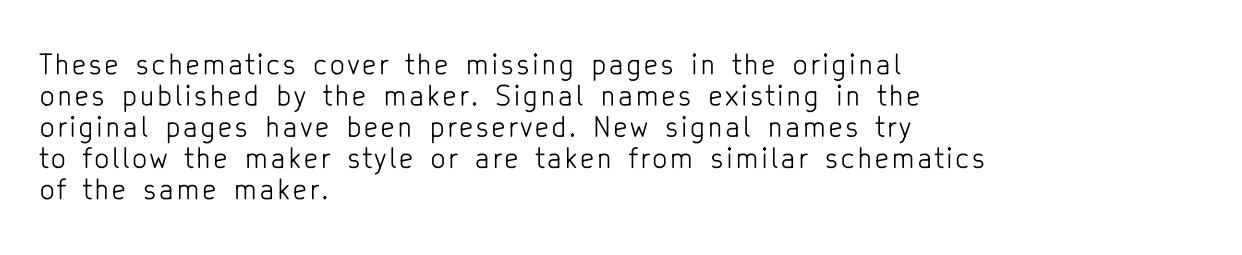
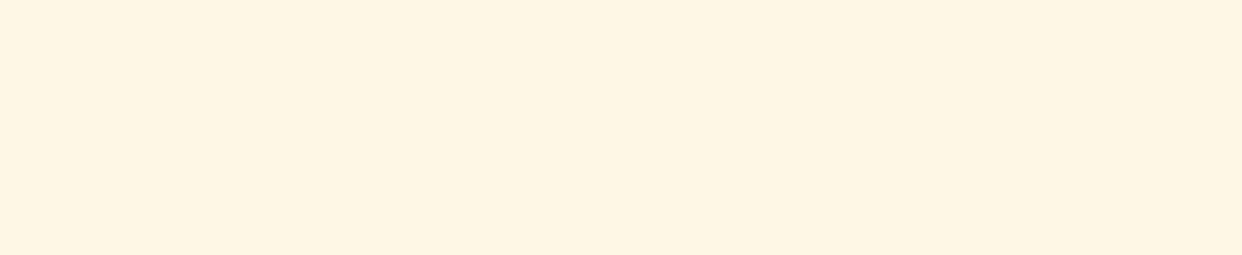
text: These schematics cover the missing pages in the original (469, 67) -> none
text: ones published by the maker. Signal names existing in the (480, 98) -> none
text: original pages have been preserved. New signal names try (475, 129) -> none
text: to follow the maker style or are taken from similar schematics (511, 160) -> none
text: of the same maker. (183, 188) -> none

